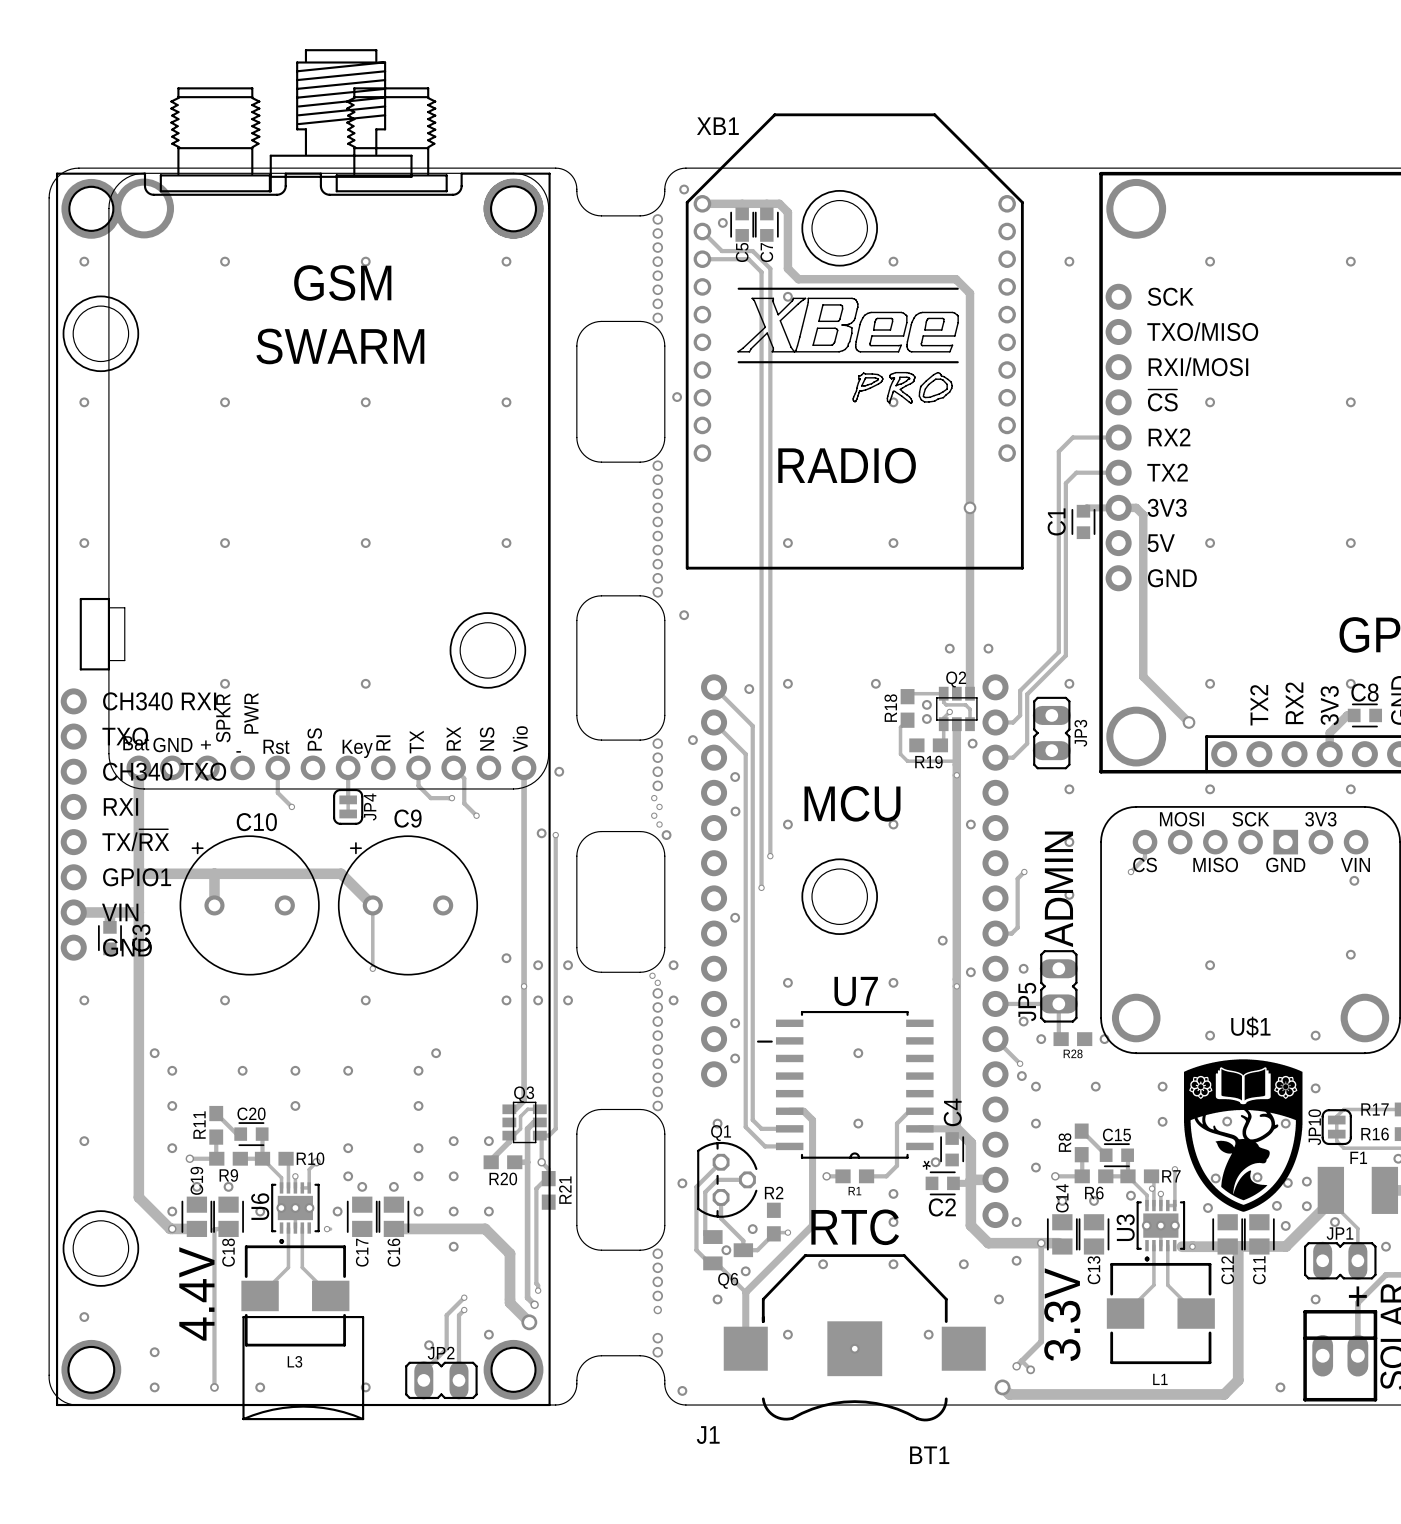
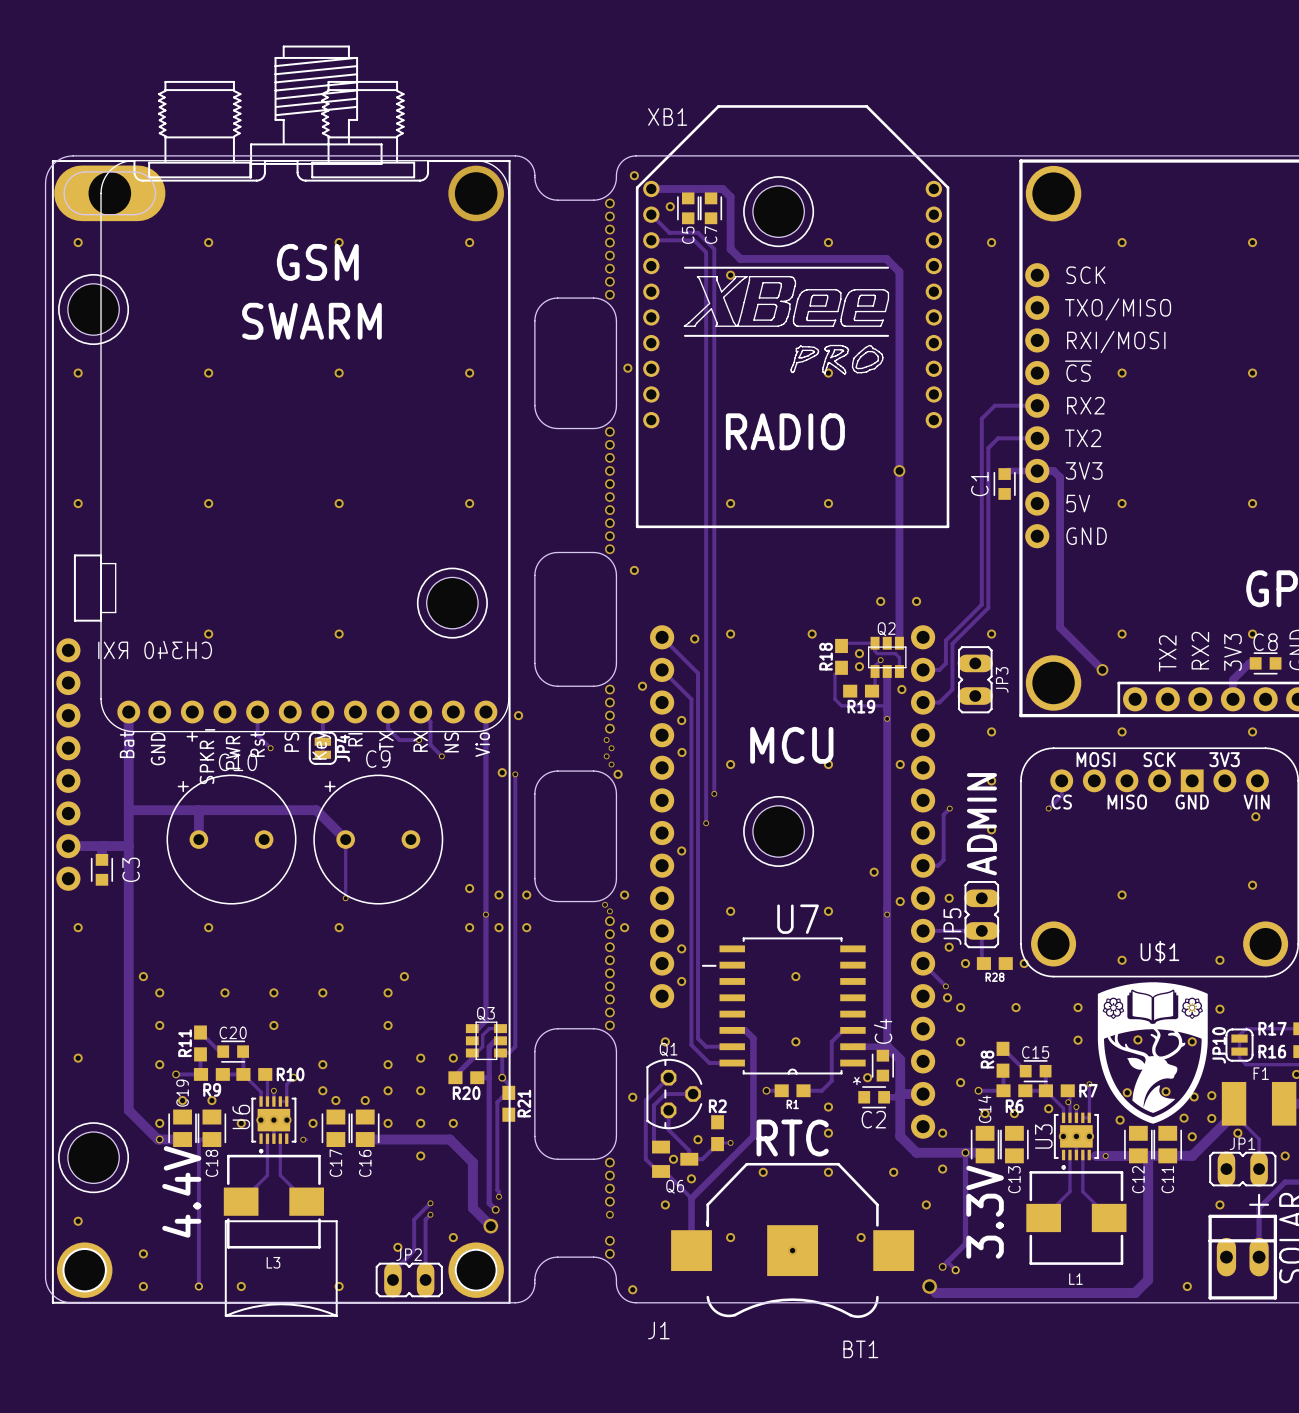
part footprint: [79, 49, 549, 789] -> [73, 45, 509, 732]
part footprint: [55, 87, 551, 1421] -> [51, 80, 511, 1317]
part: none -> (109, 193)
via: none -> (476, 193)

